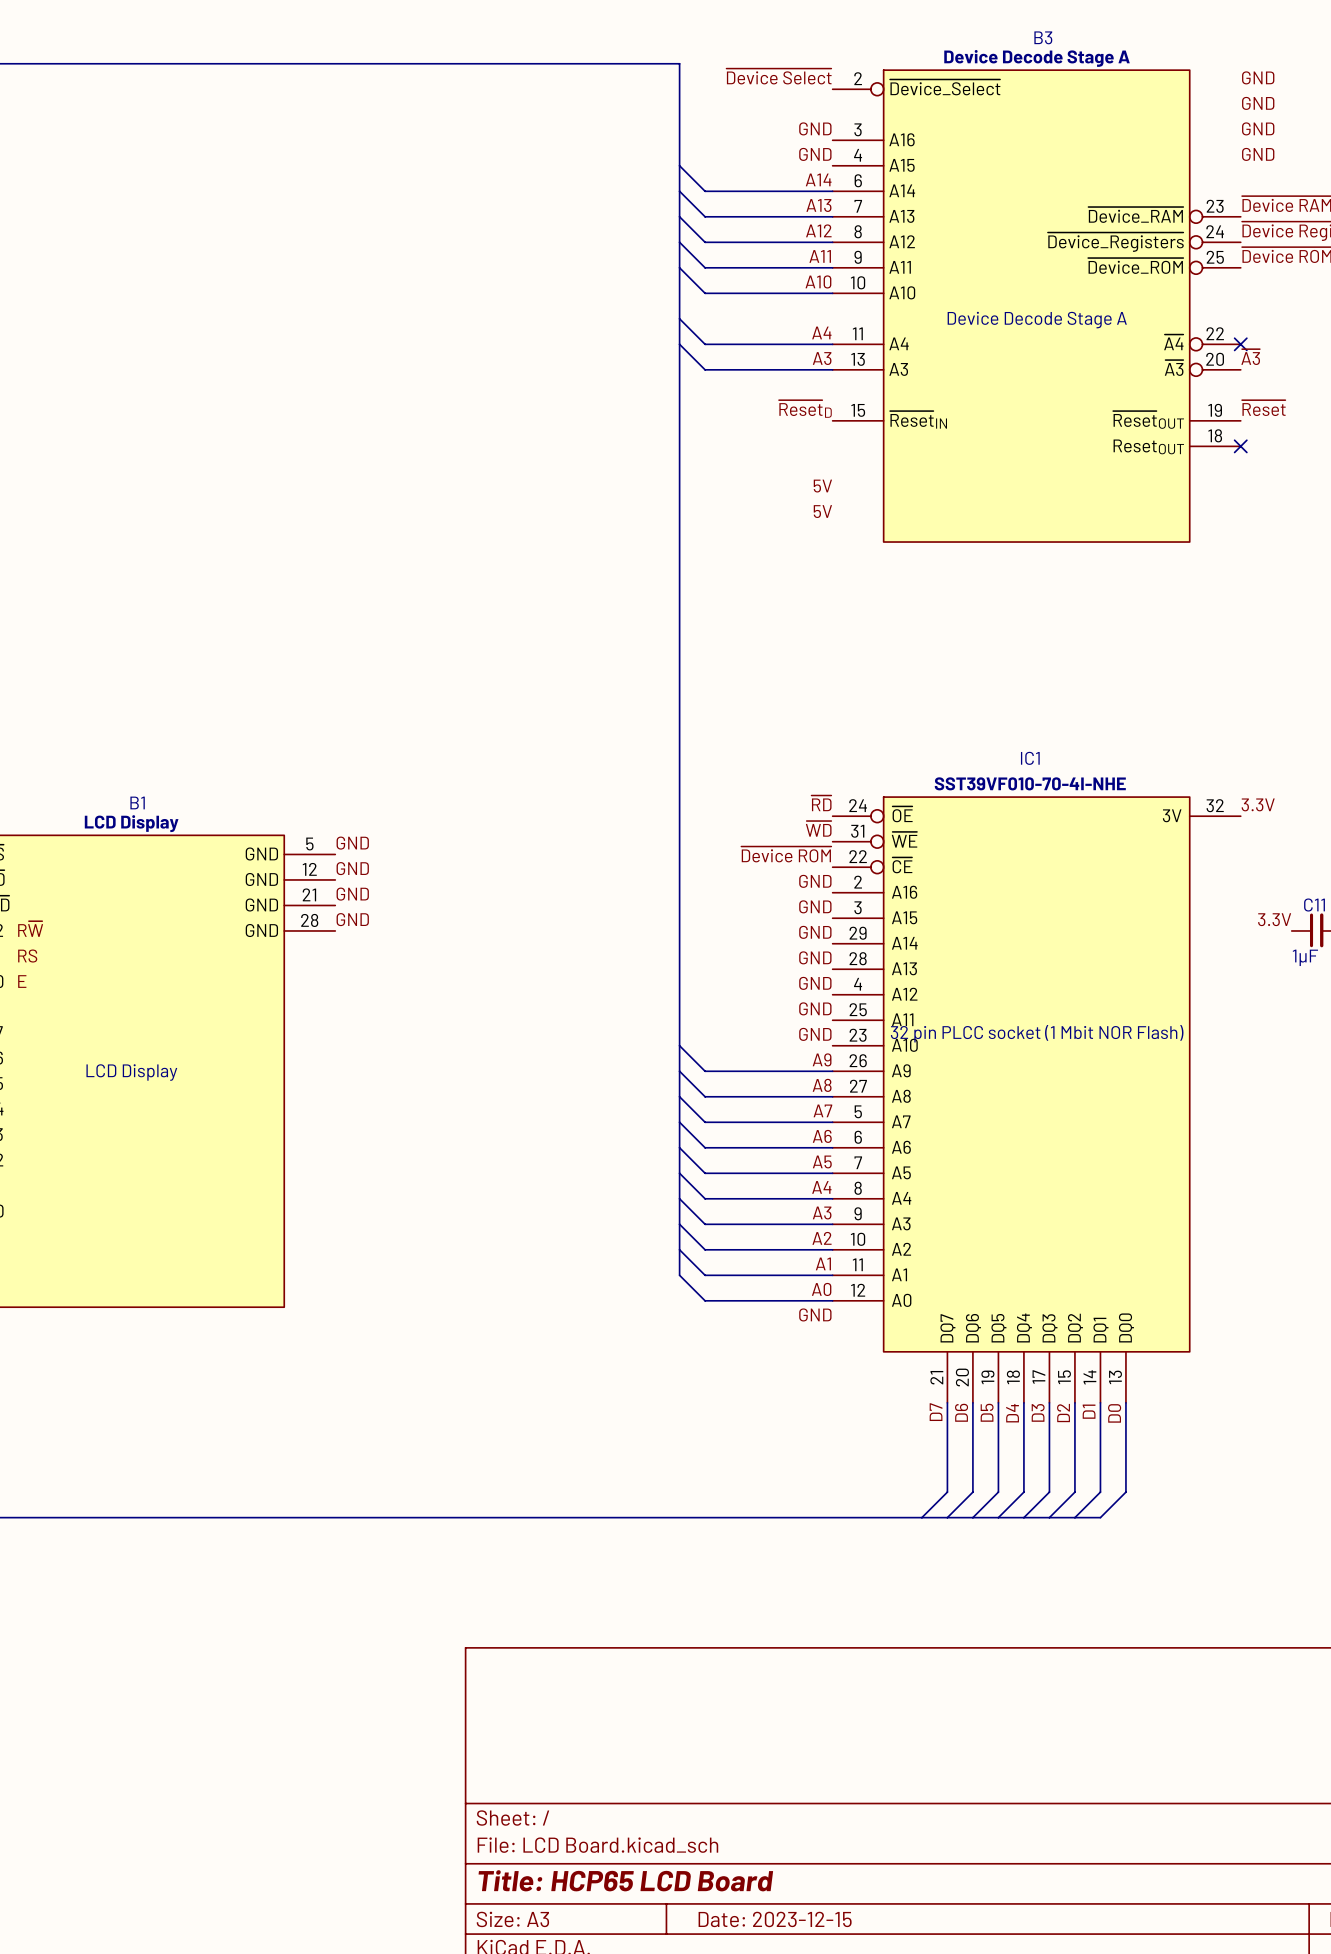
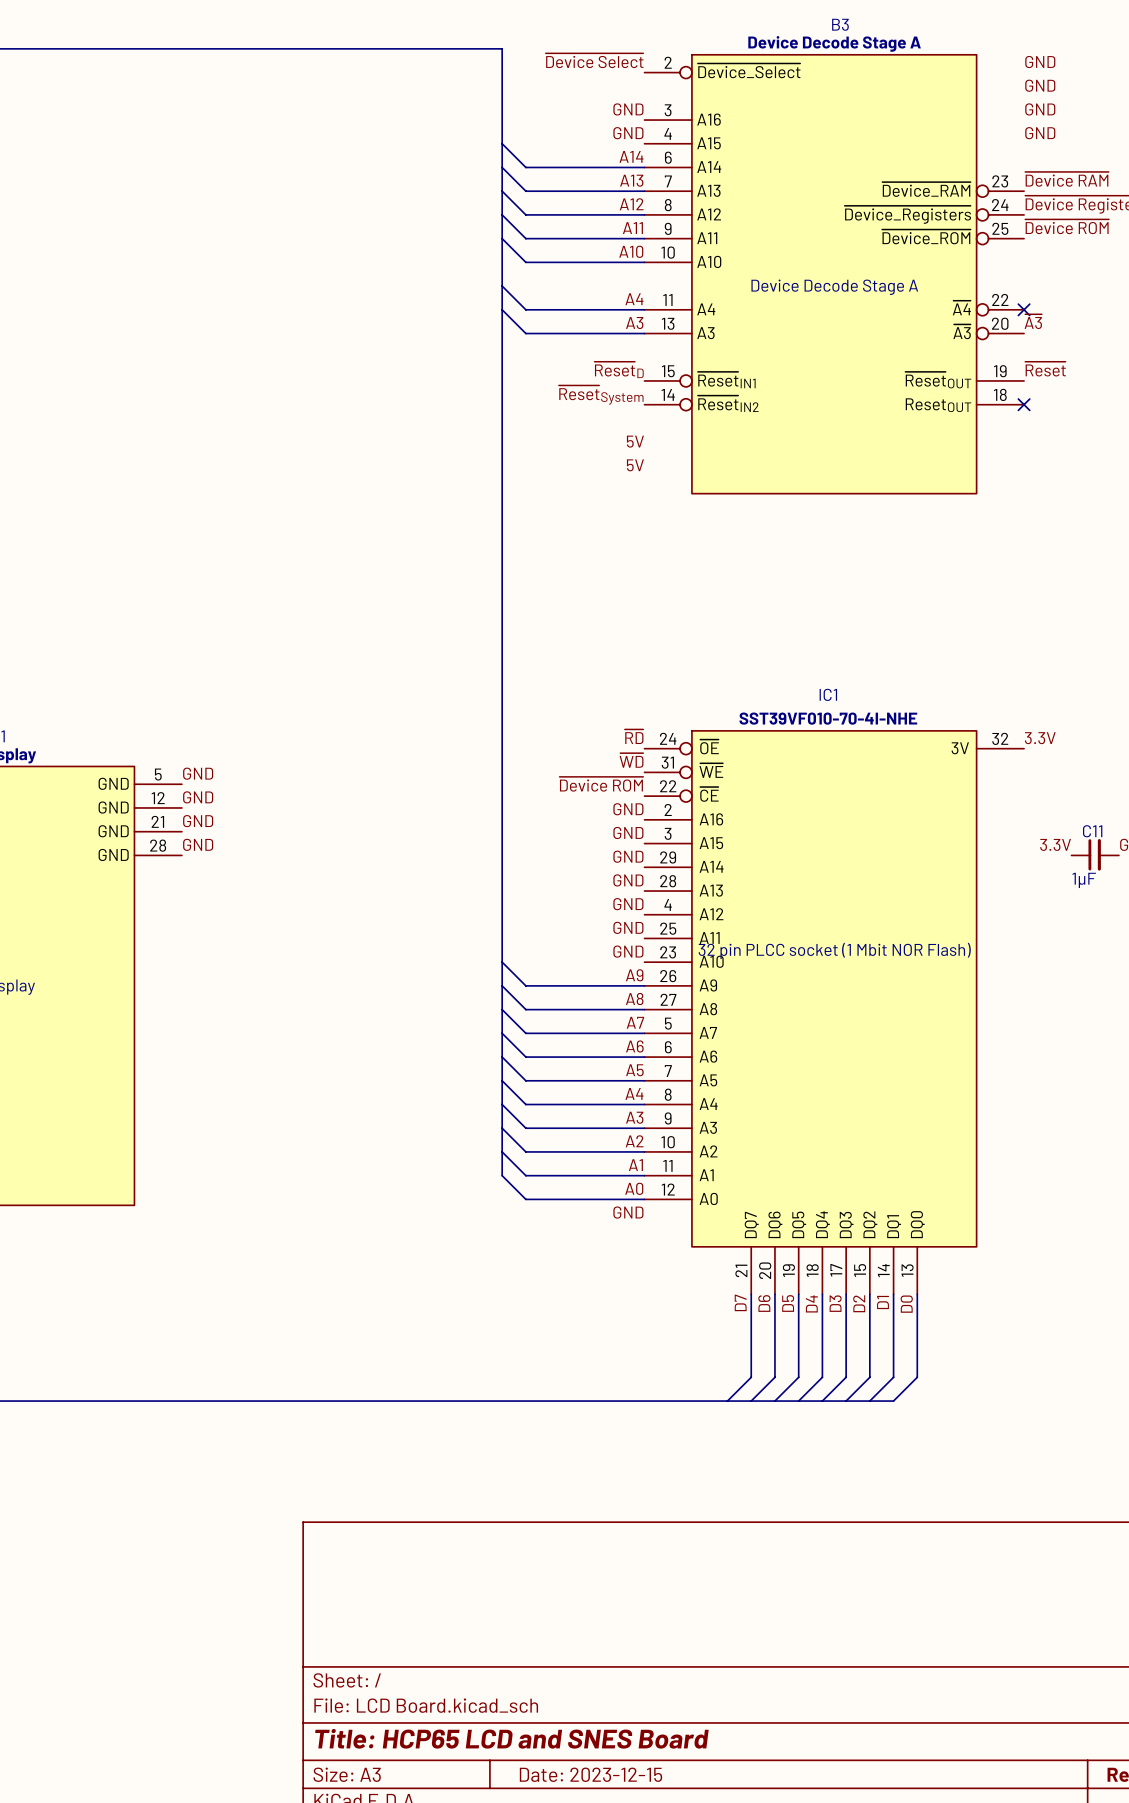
B3 symbol: [832, 69, 1241, 543] -> [644, 54, 1025, 495]
label: none -> ~{Reset}System (601, 395)
title block: Title: HCP65 LCD Board (625, 1880) -> Title: HCP65 LCD and SNES Board (511, 1738)

